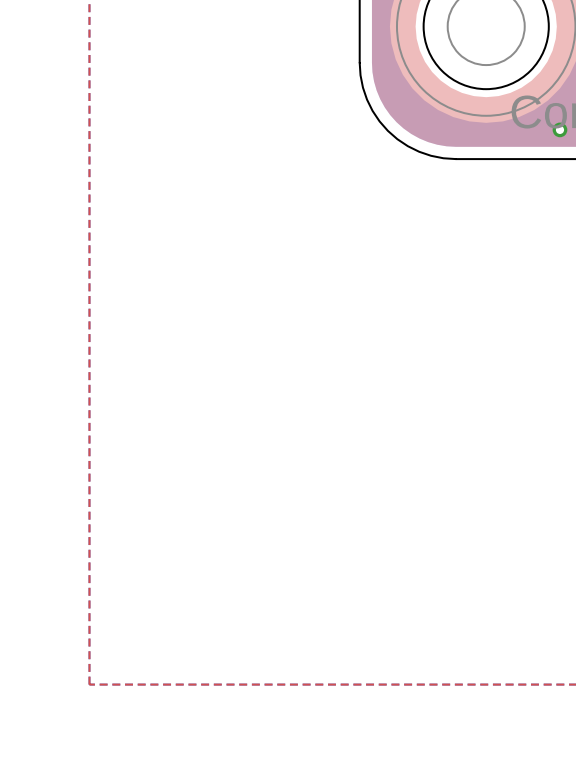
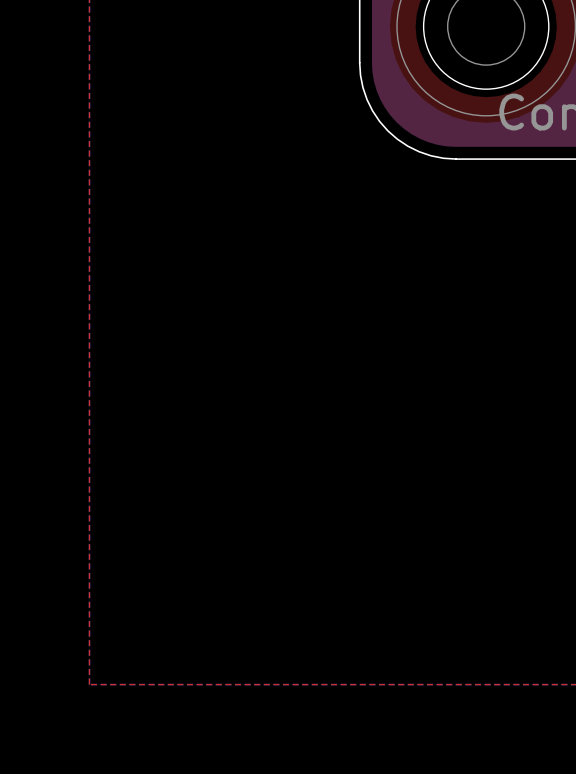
via: (559, 129) -> none

